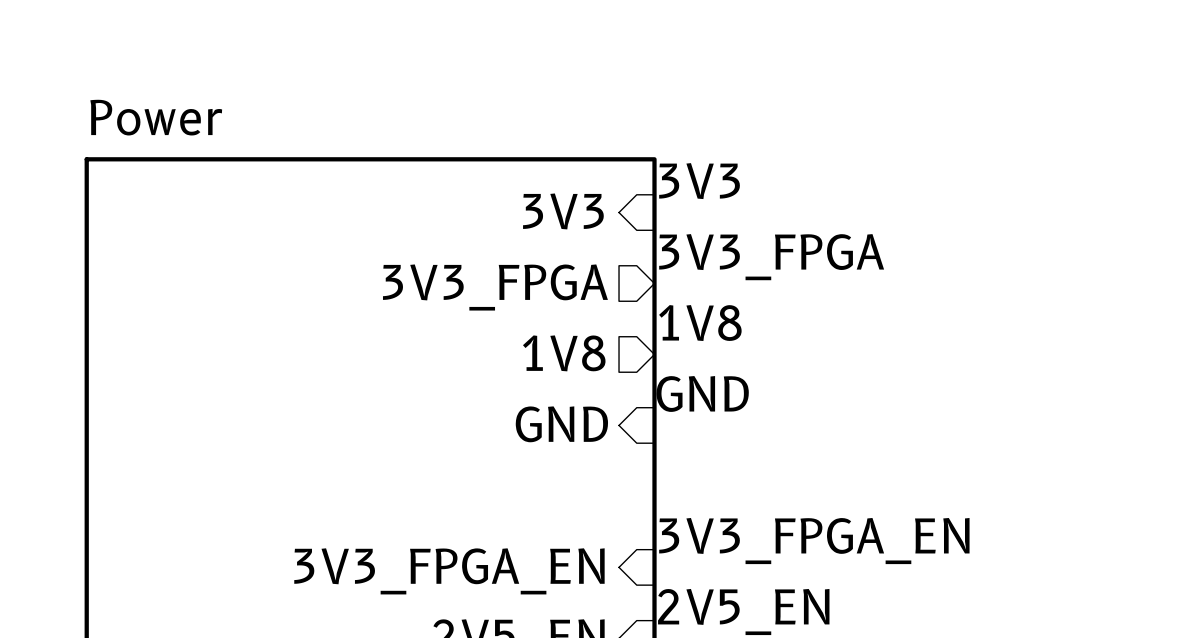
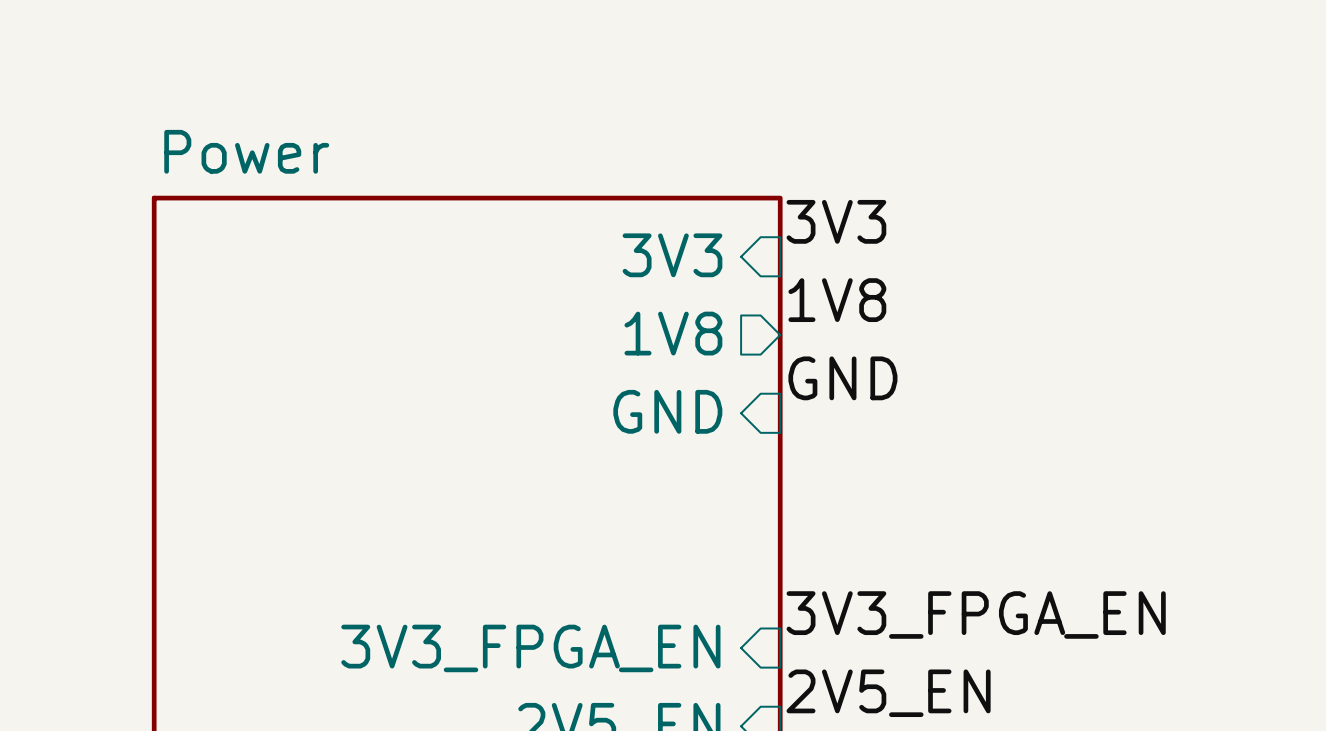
label: 3V3_FPGA (771, 257) -> 1V8 (837, 300)
sheet pin: 3V3_FPGA (495, 287) -> 1V8 (673, 333)
label: 1V8 (700, 323) -> GND (842, 378)
sheet pin shape: output (564, 353) -> input (667, 411)
sheet pin: 1V8 (564, 353) -> GND (667, 411)
label: GND (702, 393) -> none
sheet pin: GND (561, 424) -> none

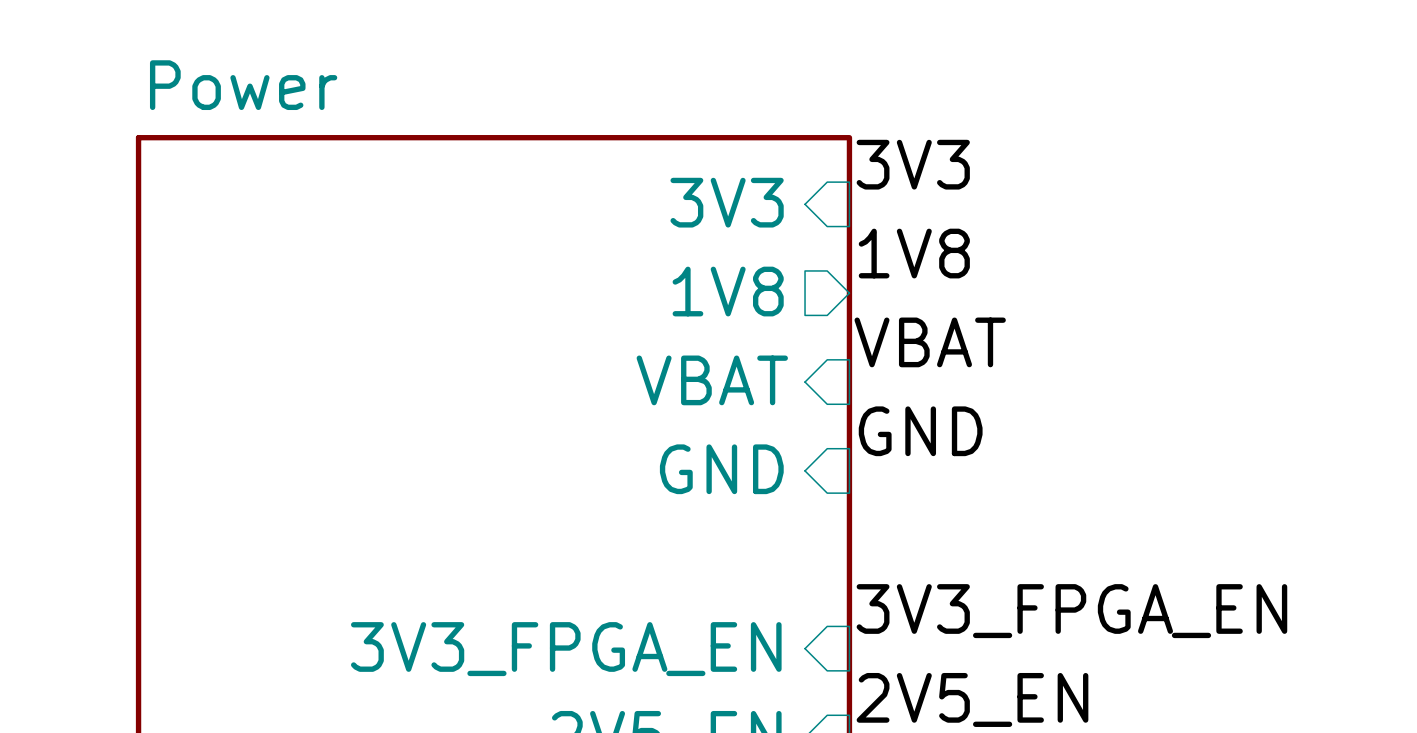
label: GND (842, 378) -> VBAT (930, 342)
sheet pin: GND (667, 411) -> VBAT (712, 380)
label: none -> GND (920, 431)
sheet pin: none -> GND (721, 469)

